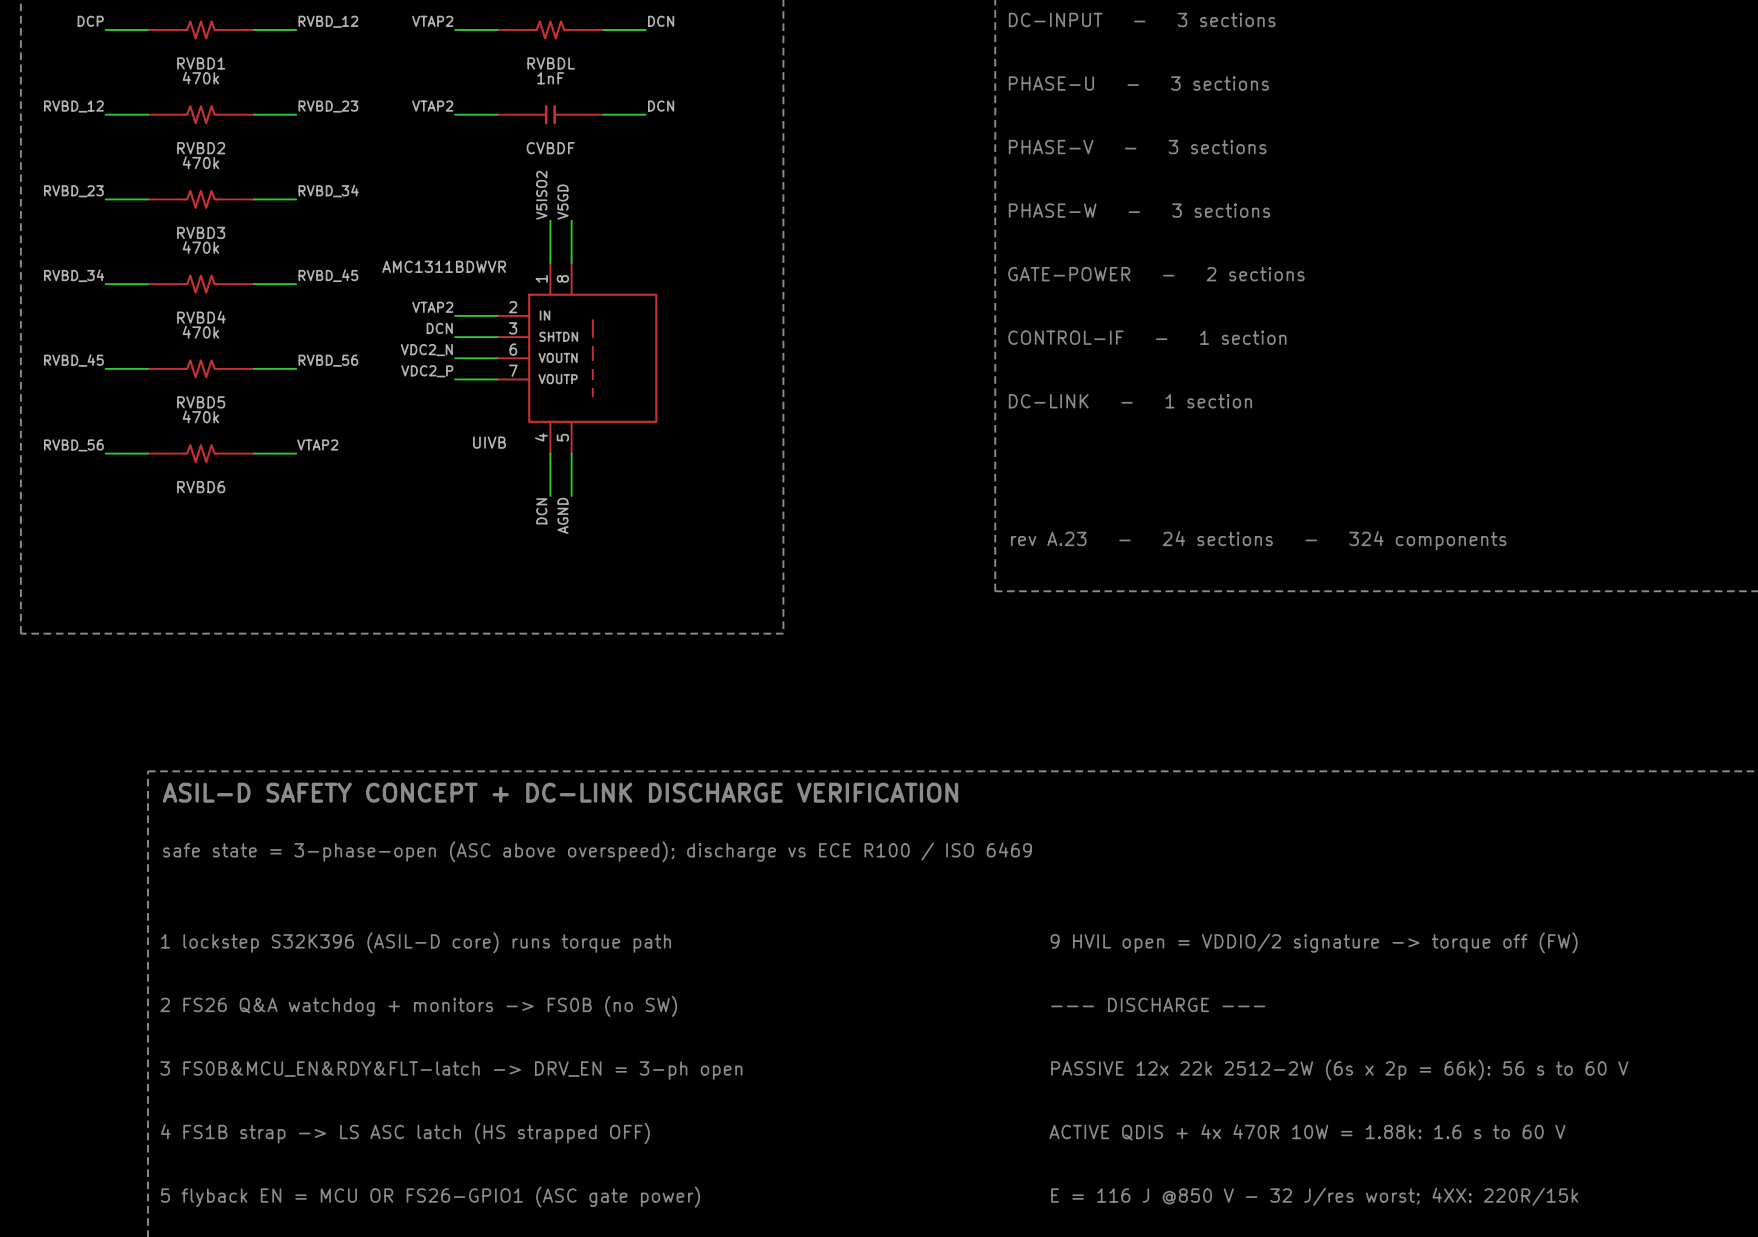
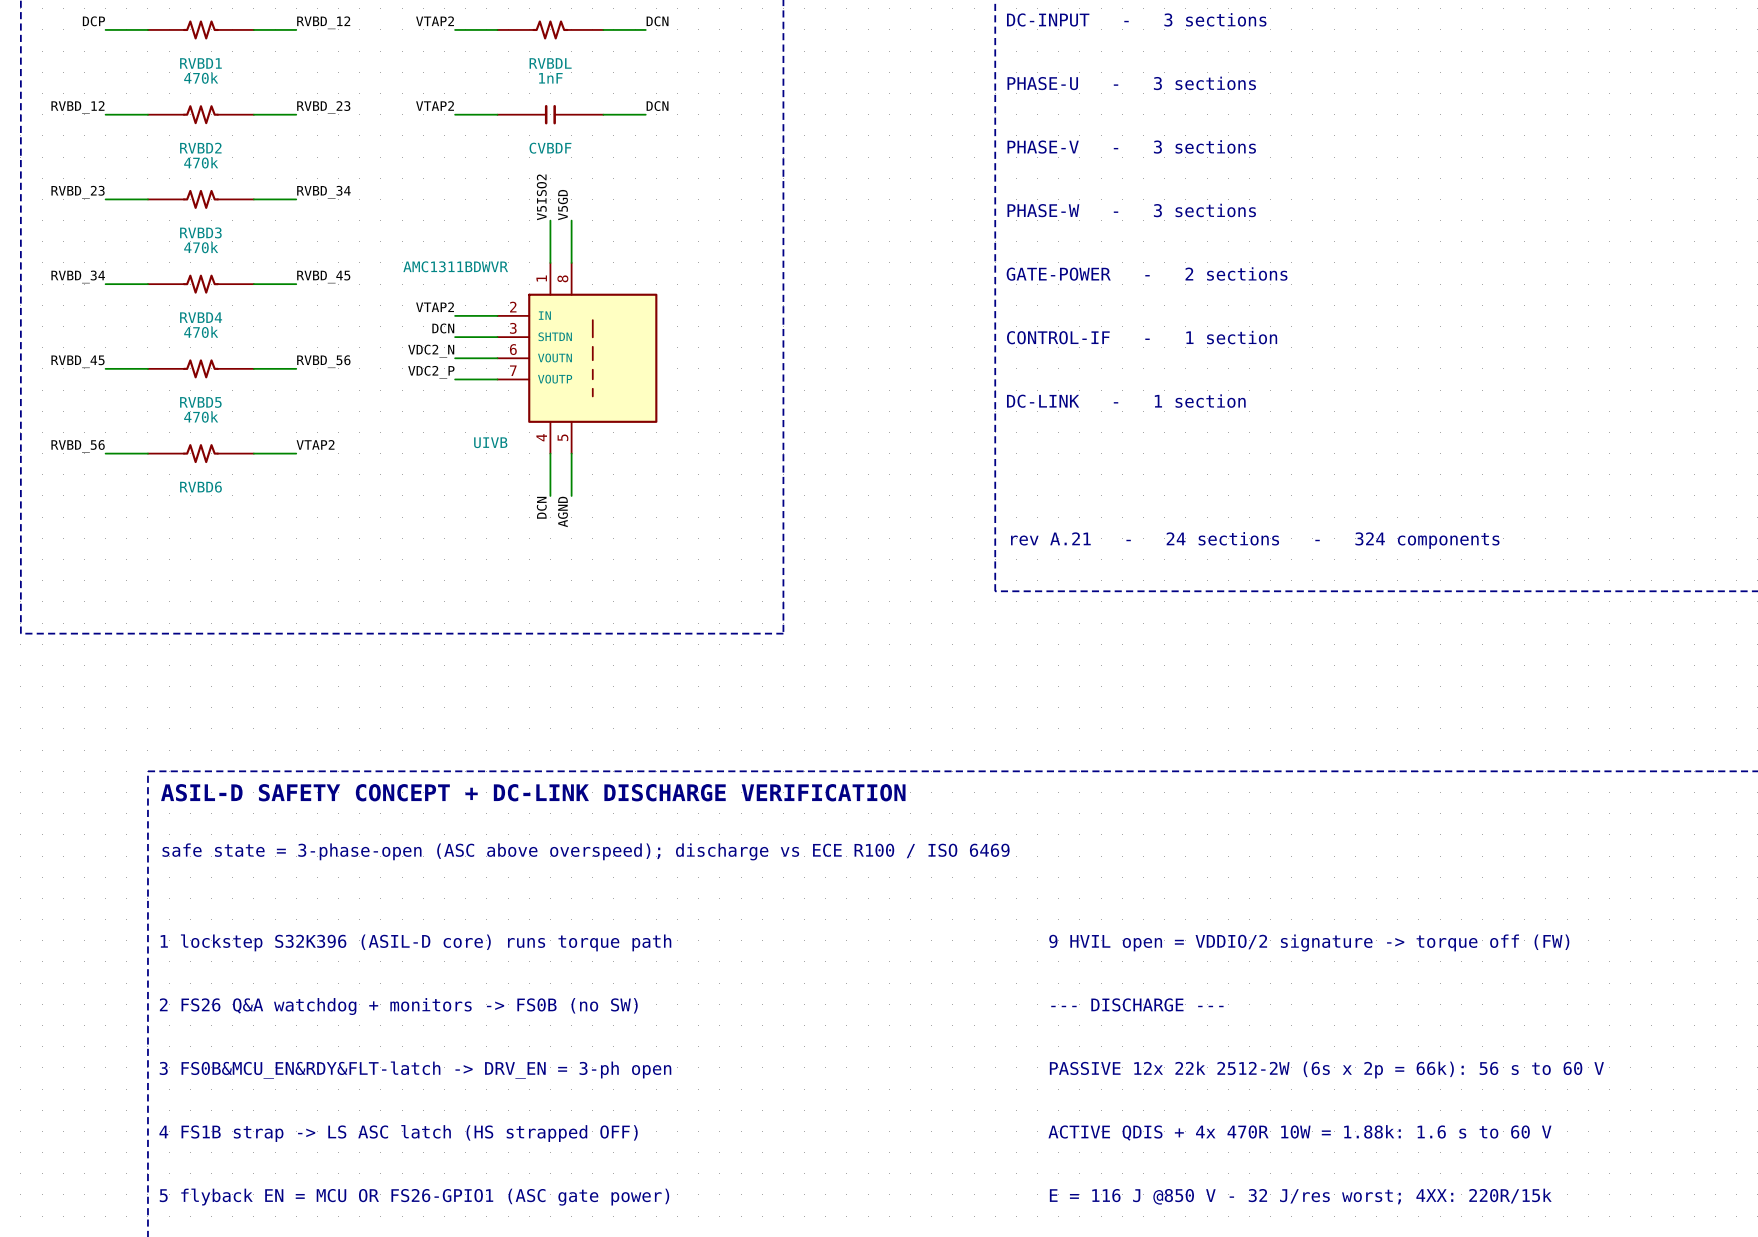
text: rev A.23 - 24 sections - 324 components (1258, 540) -> rev A.21 - 24 sections - 324 components (1255, 540)

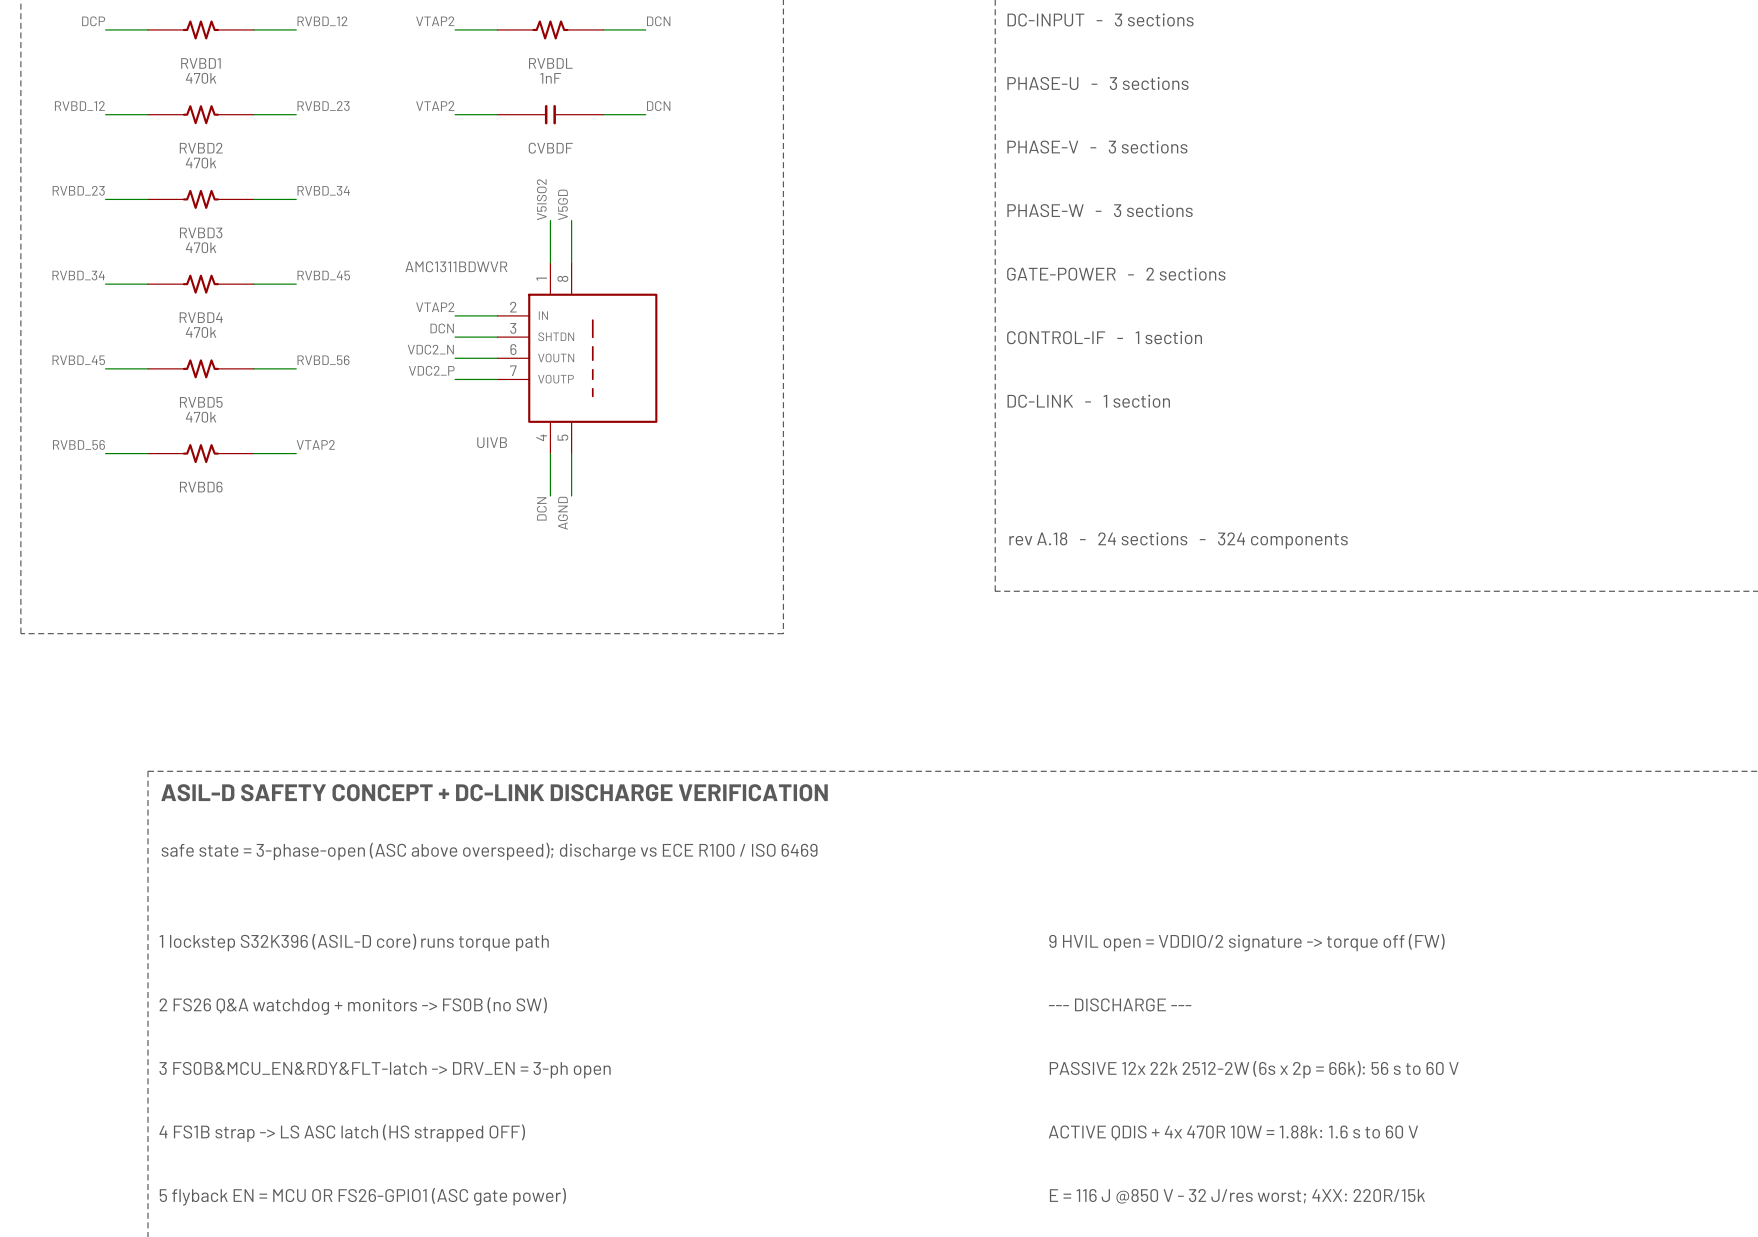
text: rev A.21 - 24 sections - 324 components (1255, 540) -> rev A.18 - 24 sections - 324 components (1178, 540)

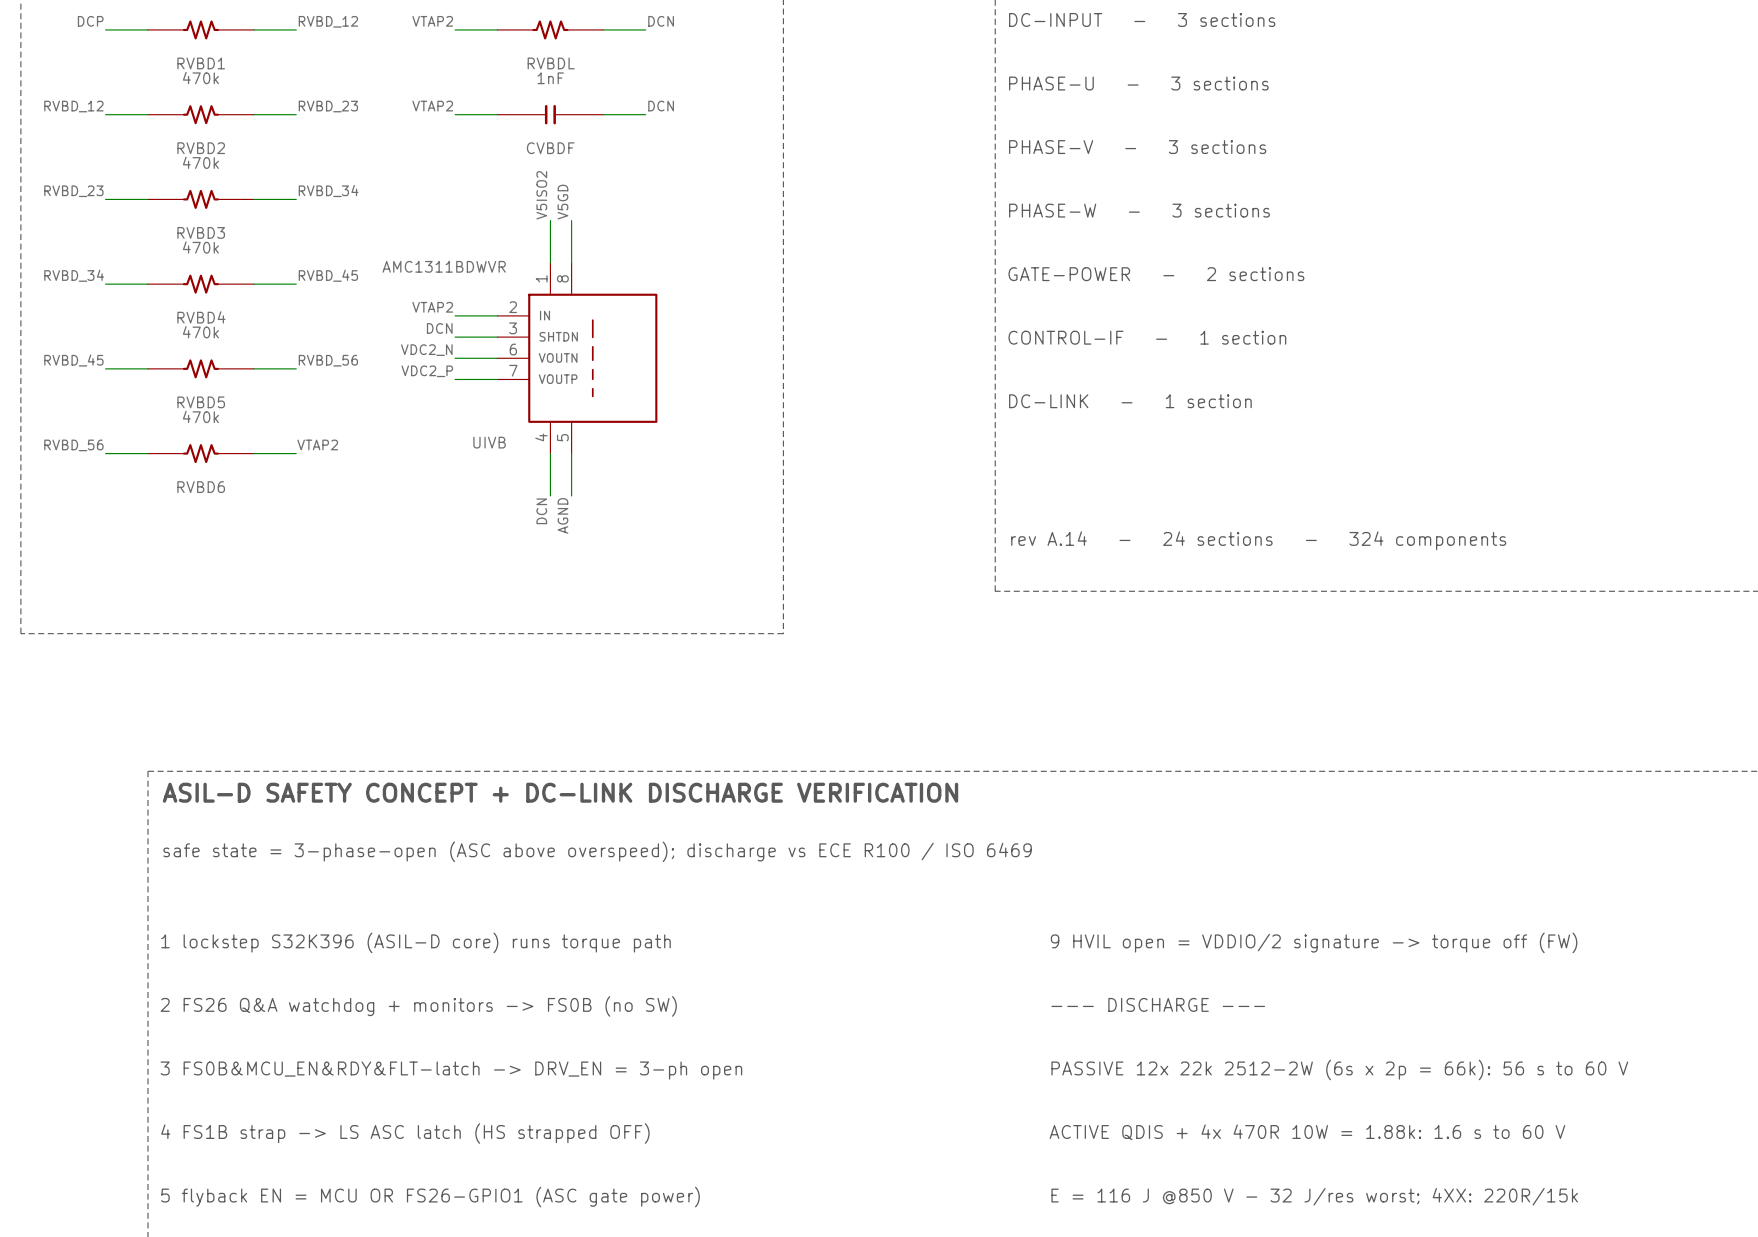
text: rev A.18 - 24 sections - 324 components (1178, 540) -> rev A.14 - 24 sections - 324 components (1258, 540)

